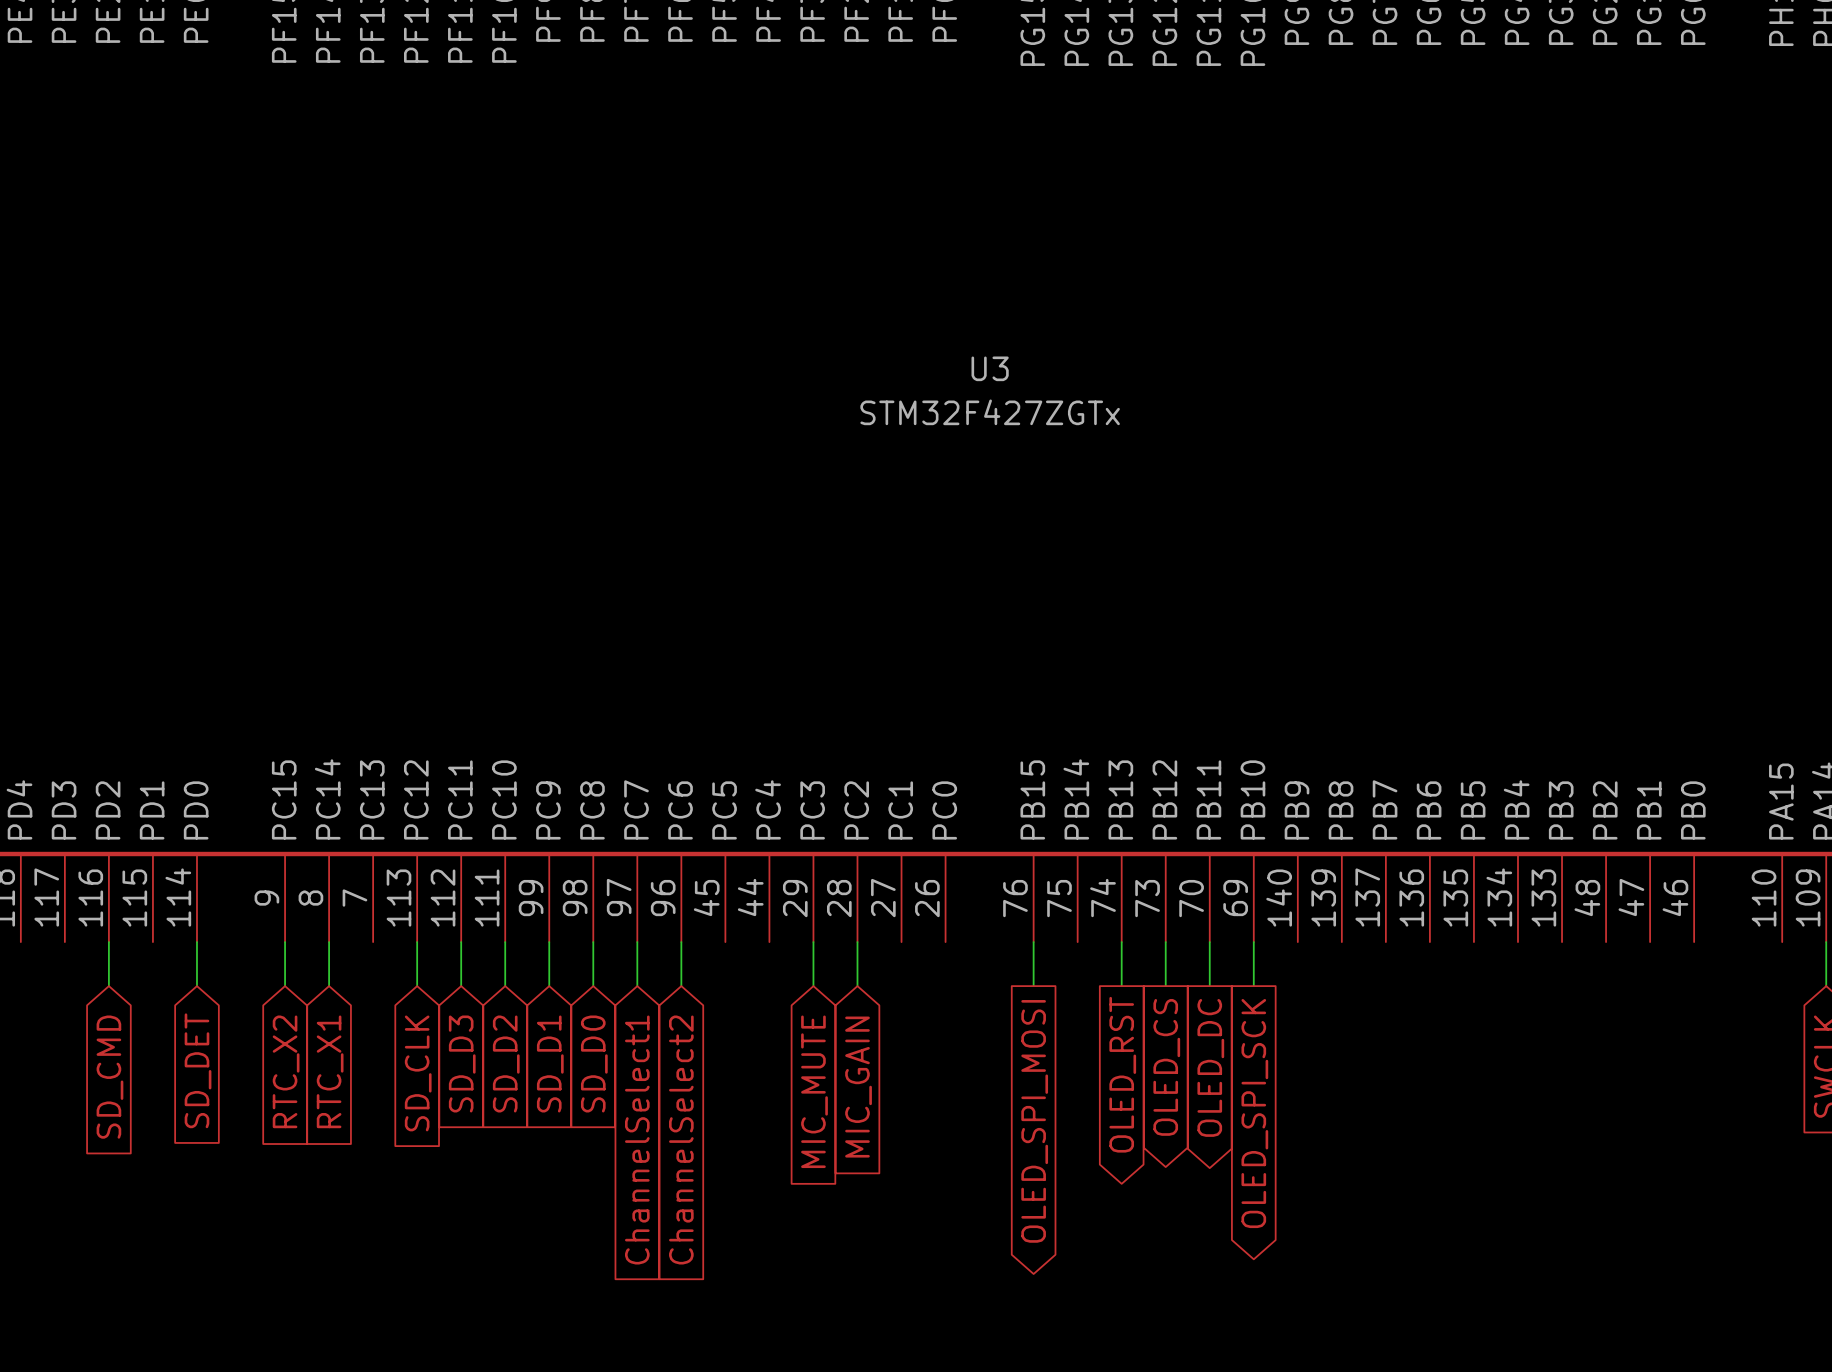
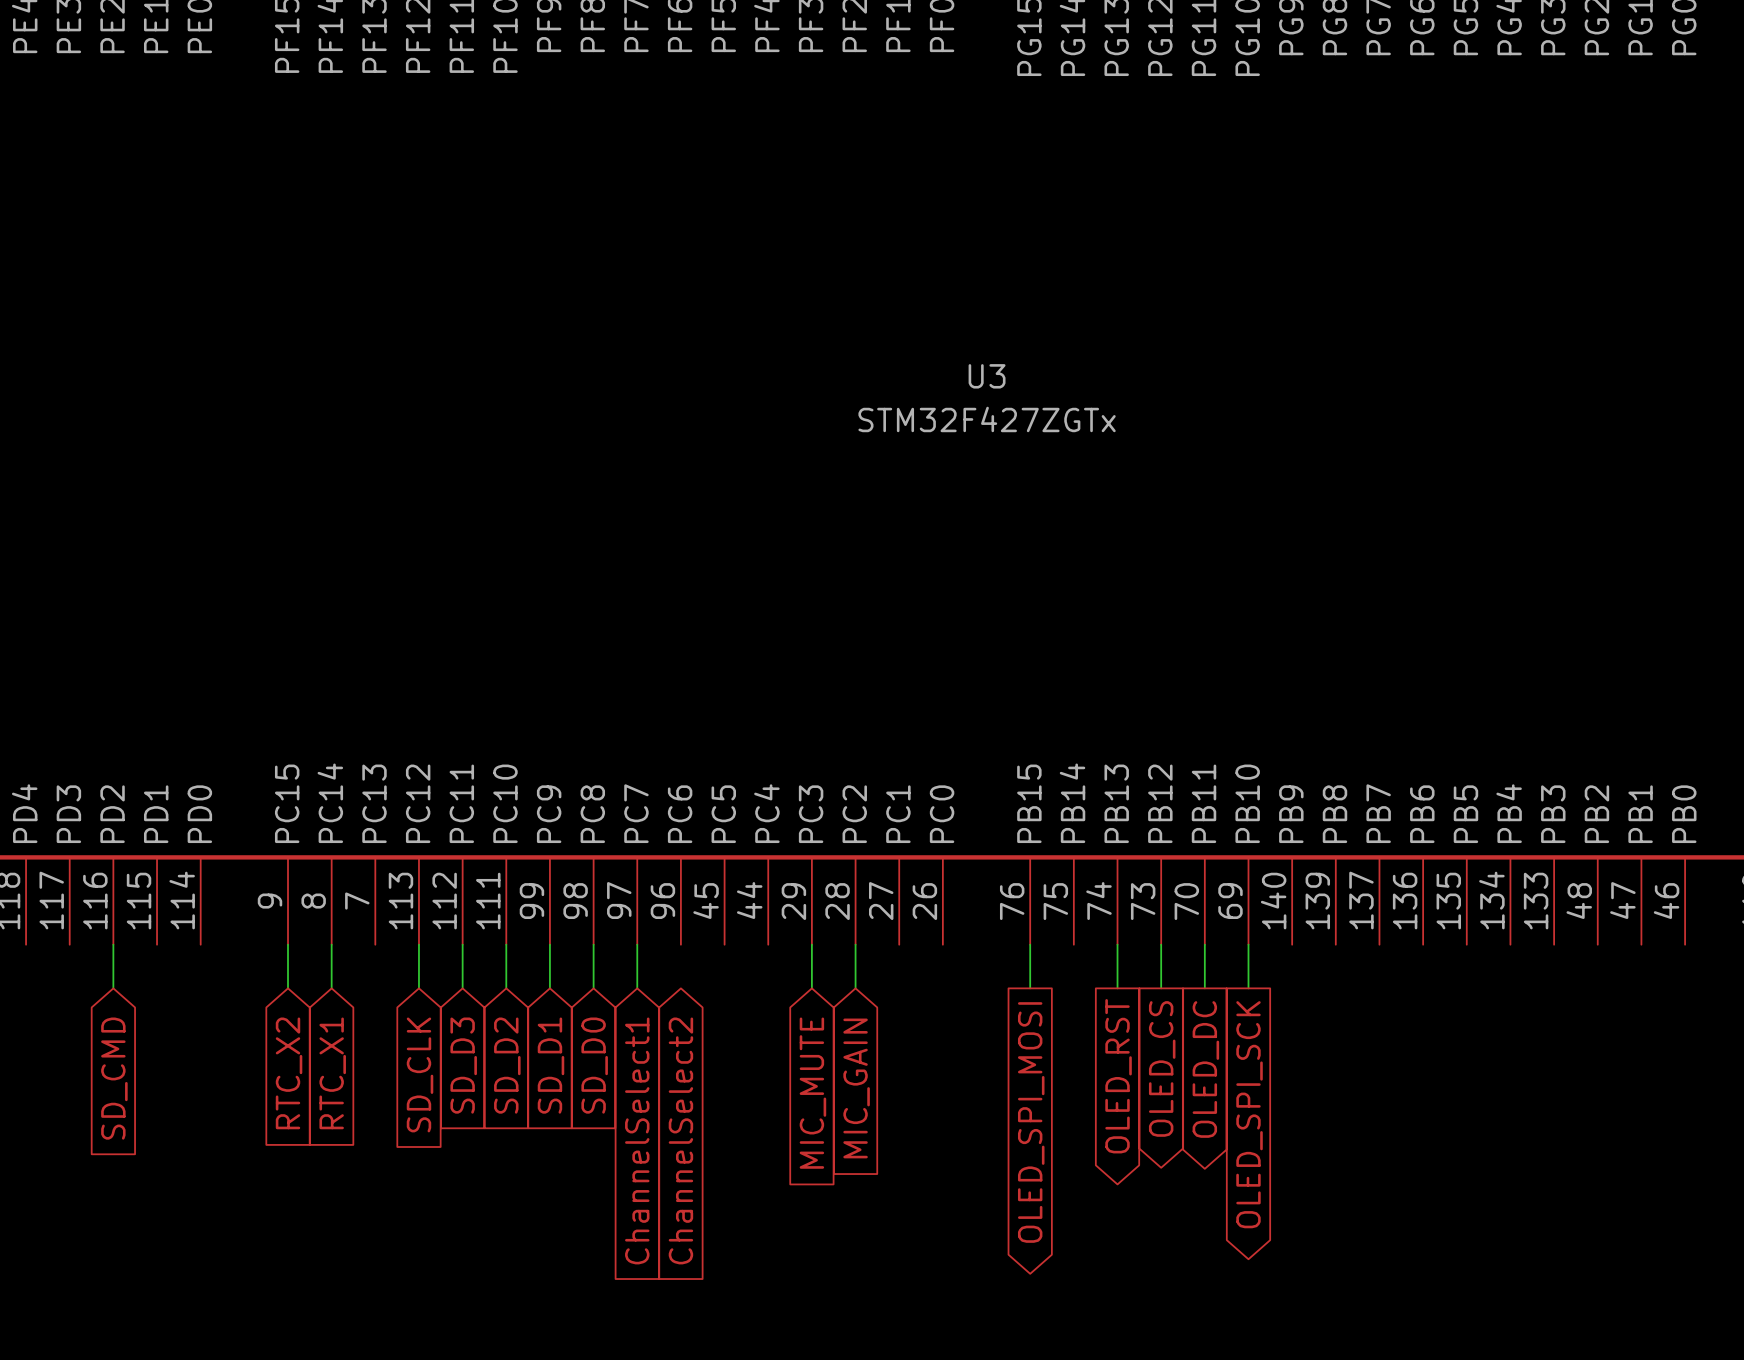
wire: (196, 942) (196, 986) -> none
wire: (681, 942) (681, 986) -> none
global label: SD_DET (198, 1070) -> none

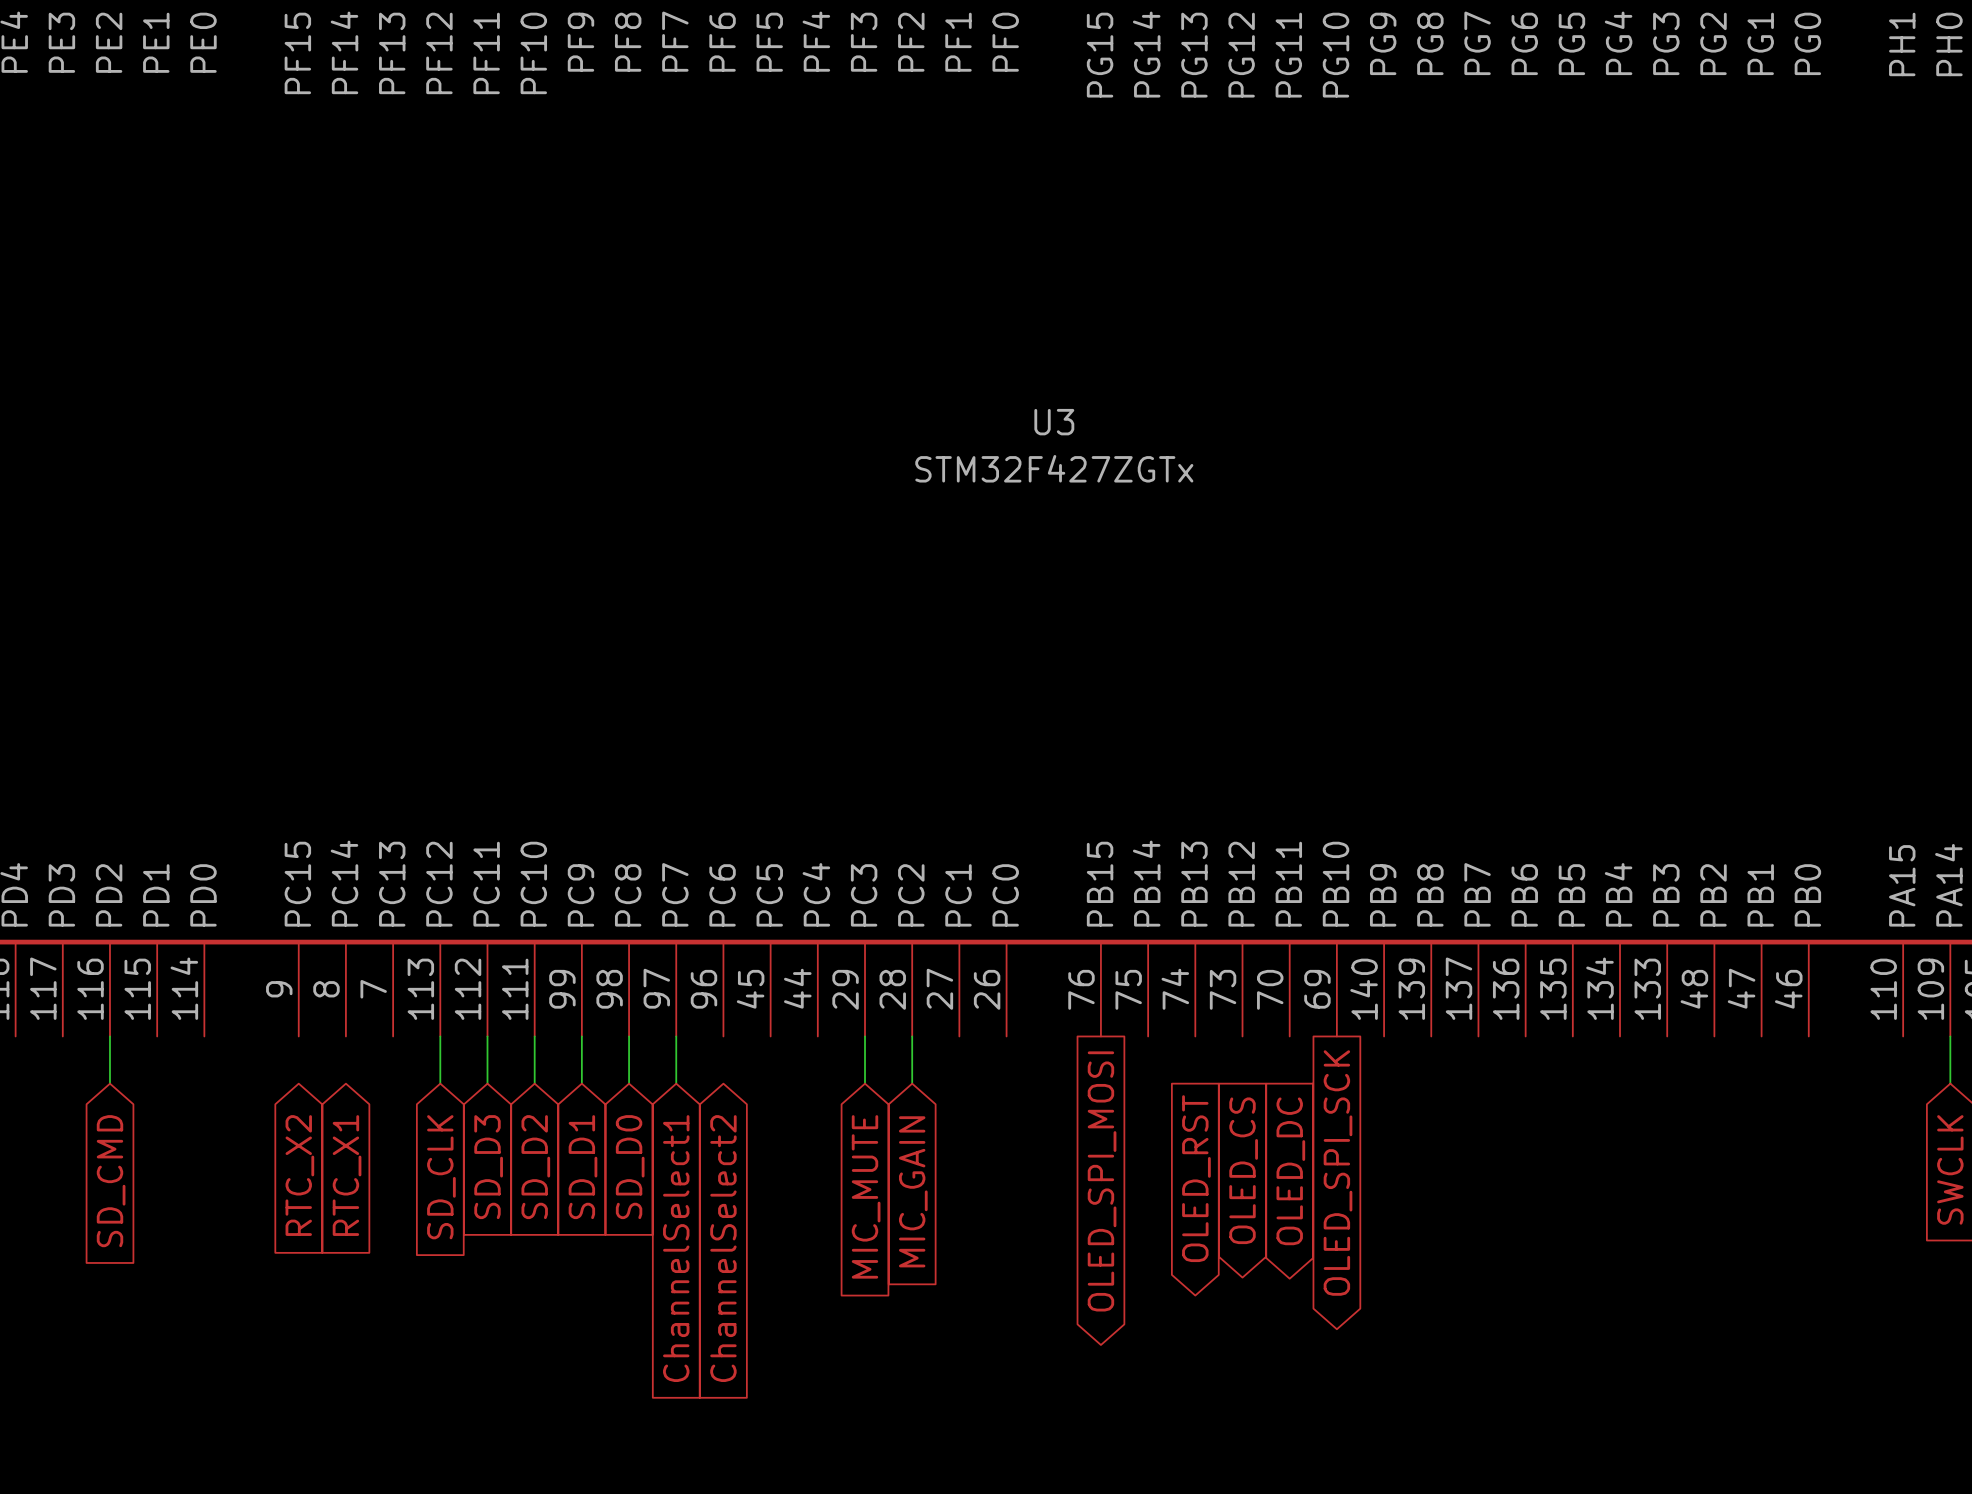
wire: (288, 944) (288, 988) -> none
wire: (331, 944) (331, 988) -> none
wire: (1030, 944) (1030, 988) -> none
wire: (1117, 944) (1117, 988) -> none
wire: (1161, 944) (1161, 988) -> none
wire: (1204, 944) (1204, 988) -> none
wire: (1248, 944) (1248, 988) -> none
global label position: OLED_SPI_SCK (1249, 1114) -> OLED_SPI_SCK (1338, 1173)
global label position: OLED_SPI_MOSI (1031, 1122) -> OLED_SPI_MOSI (1102, 1181)

